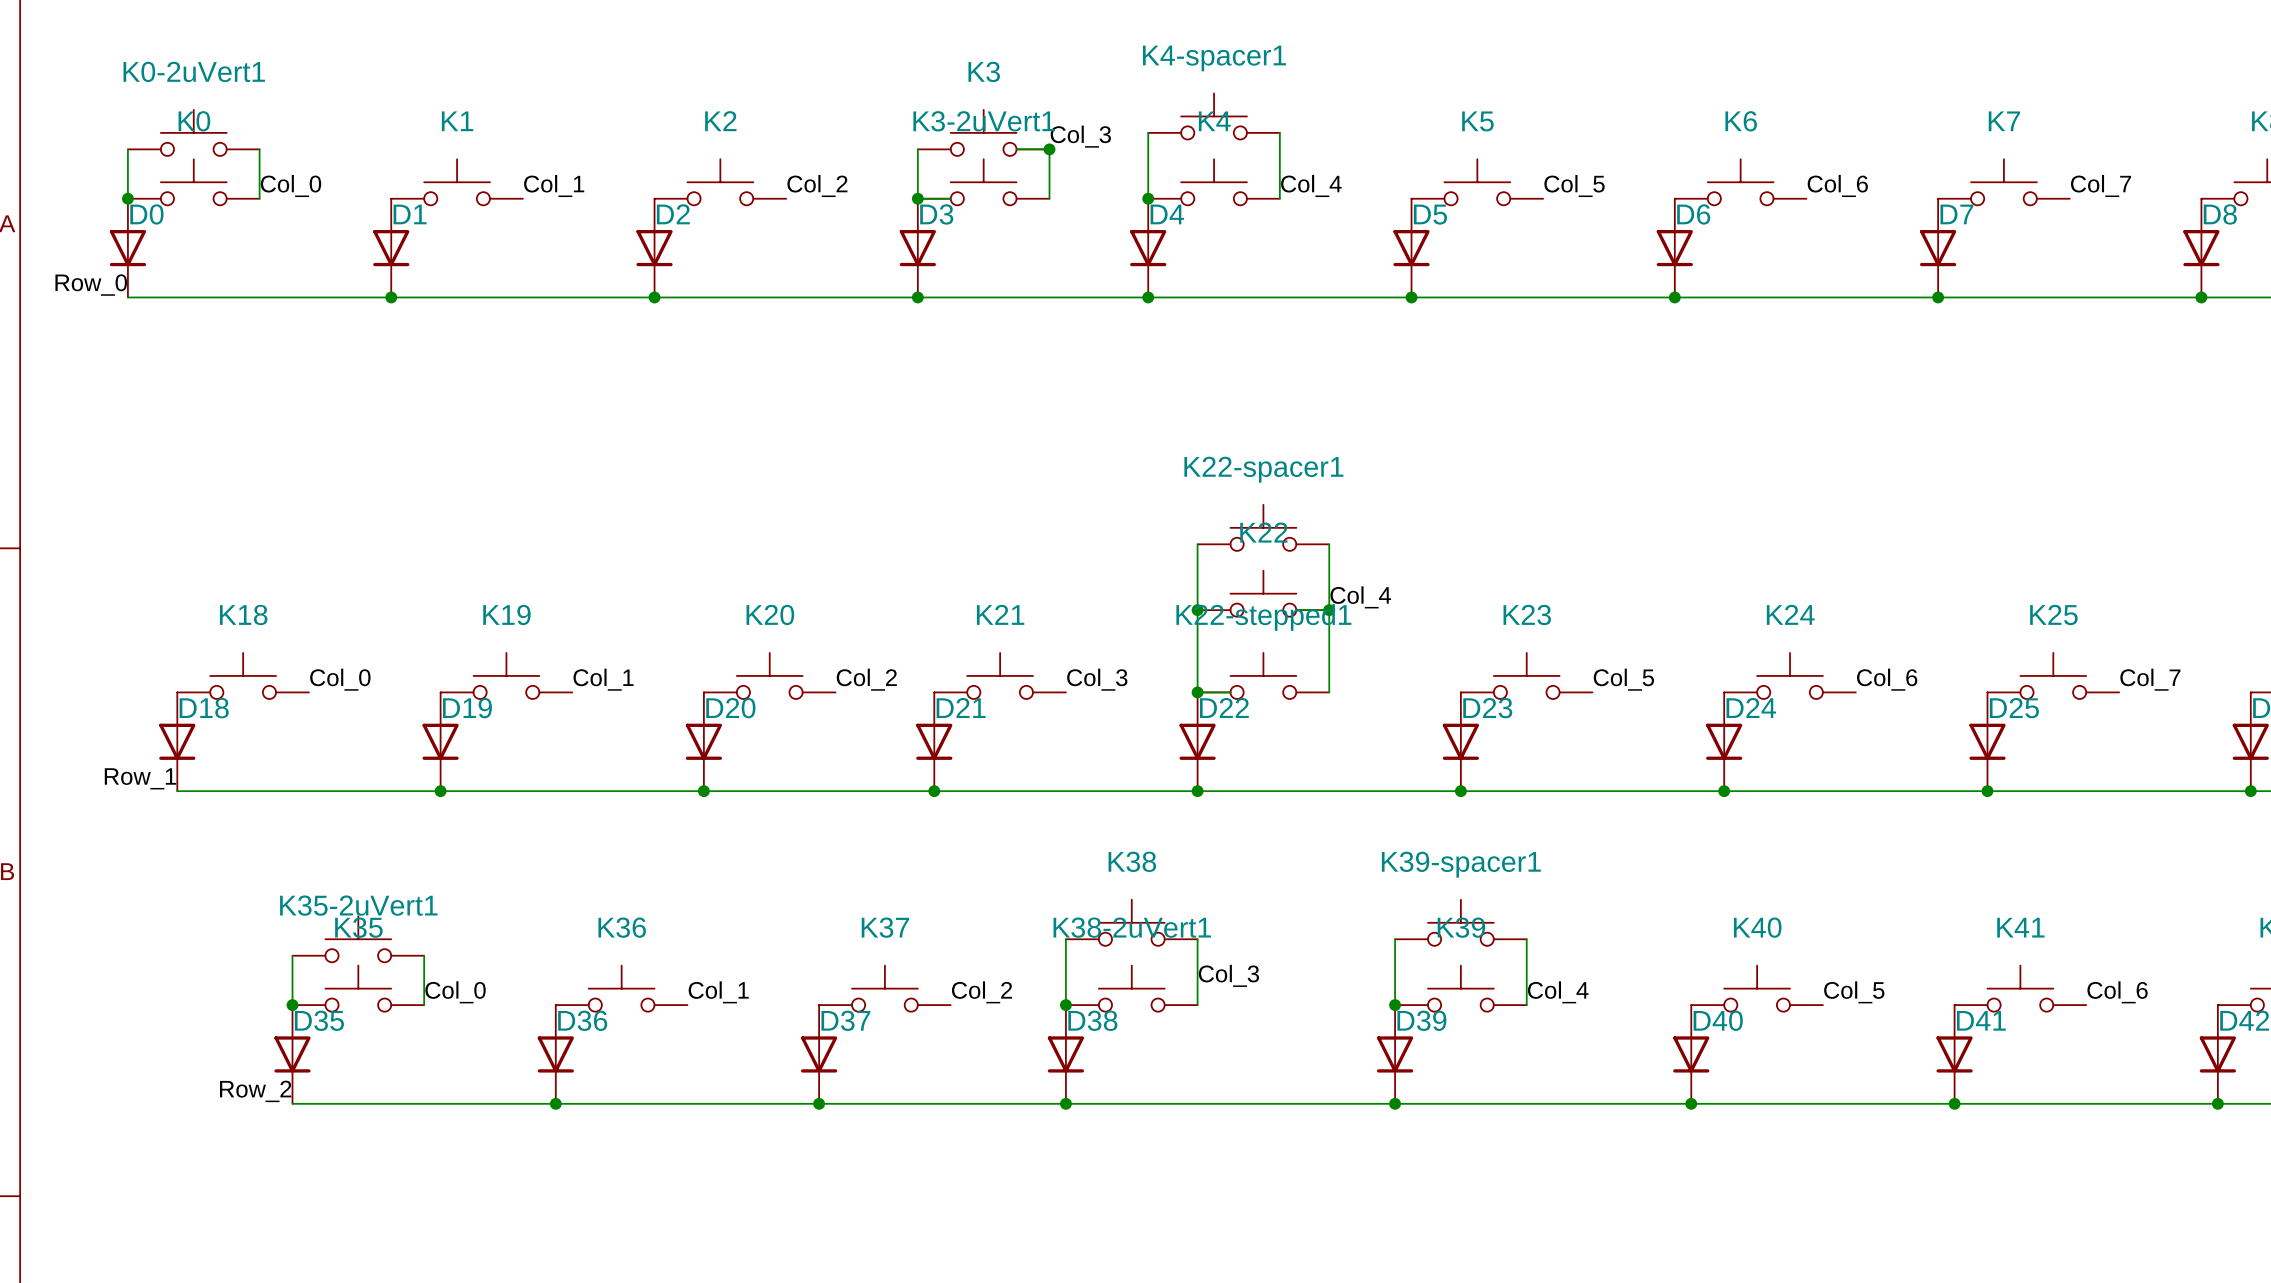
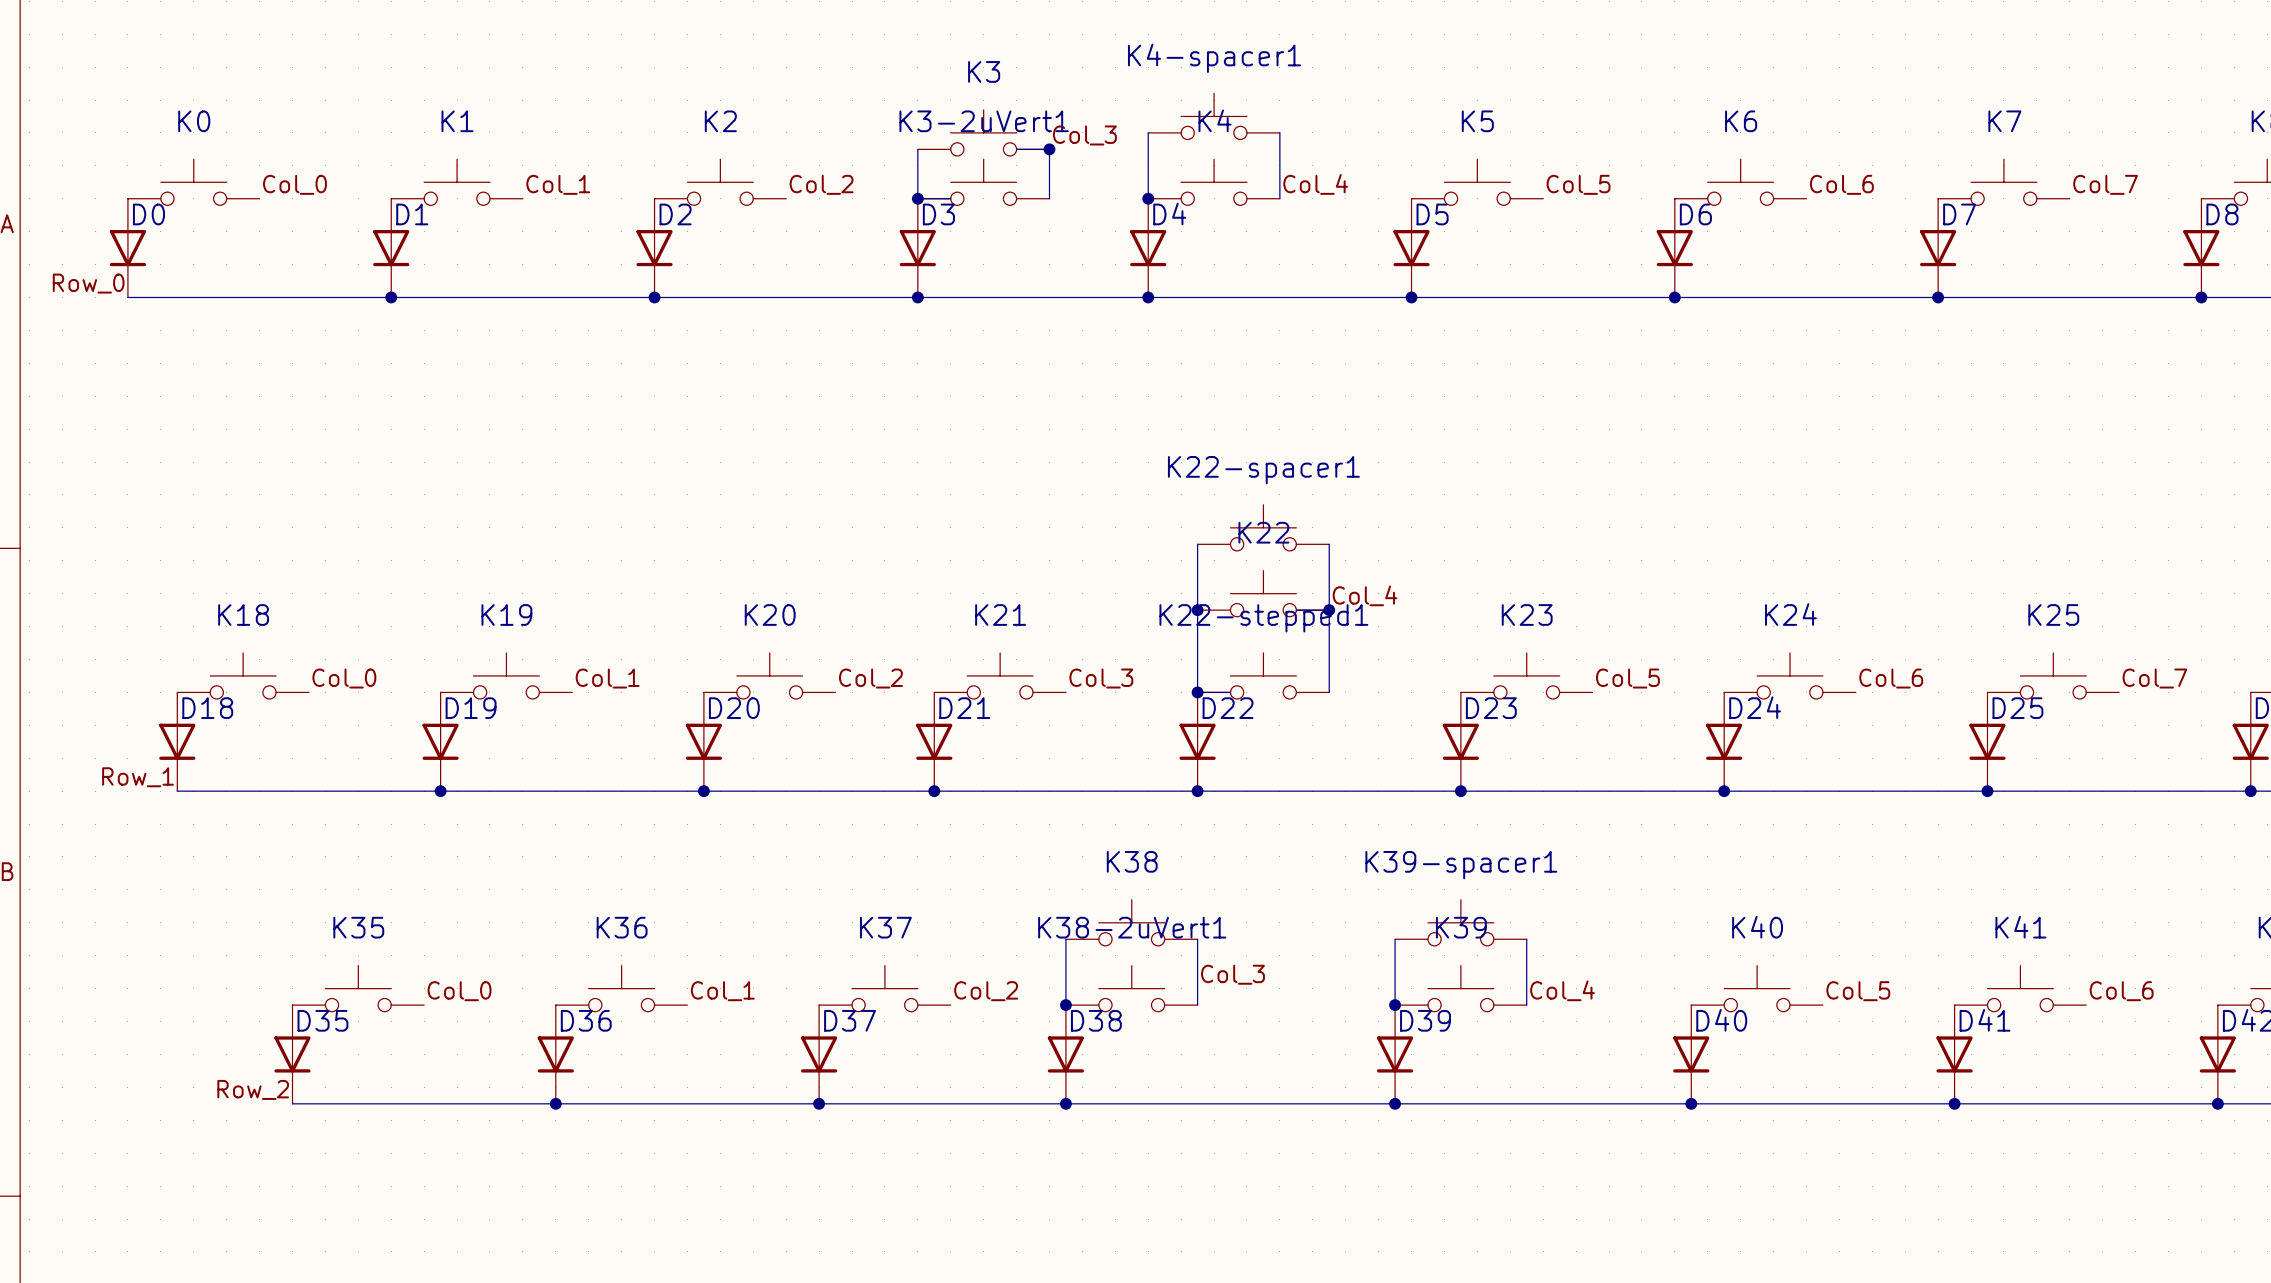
K0-2uVert1: (193, 132) -> none
wire: (127, 149) (127, 198) -> none
wire: (259, 149) (259, 198) -> none
junction: (127, 198) -> none
K35-2uVert1: (358, 939) -> none
wire: (292, 955) (292, 1005) -> none
wire: (424, 955) (424, 1005) -> none
junction: (292, 1005) -> none

